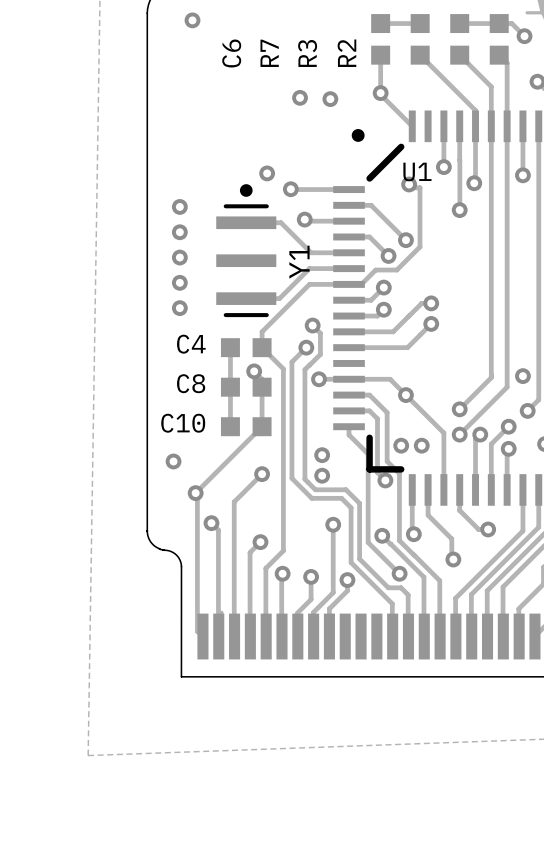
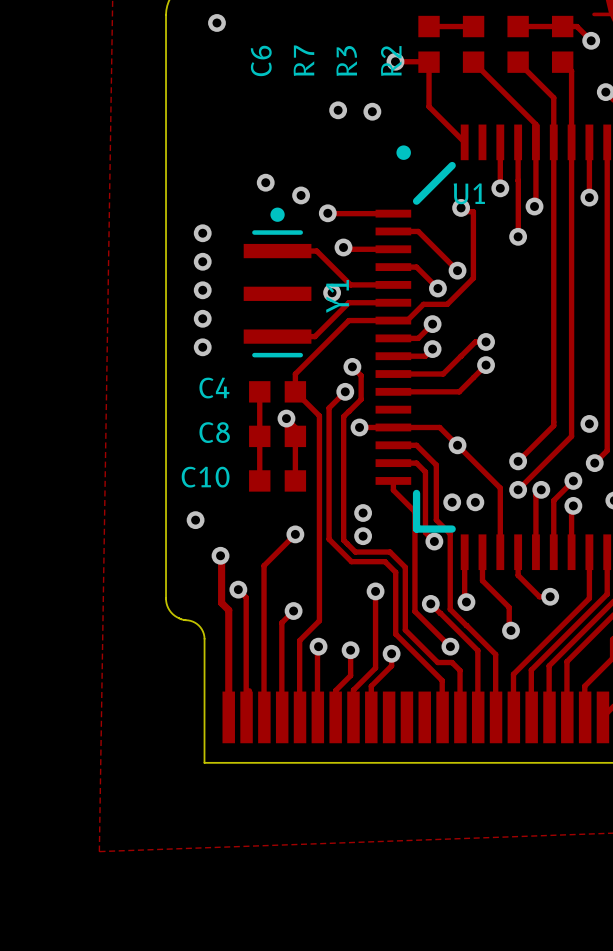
track: none -> (395, 61) (428, 61)
via position: (380, 93) -> (395, 61)
via: none -> (265, 182)
via: none -> (332, 292)
track: (262, 426) (197, 491) (197, 631) (202, 636) -> (220, 555) (221, 603) (228, 610) (228, 717)

